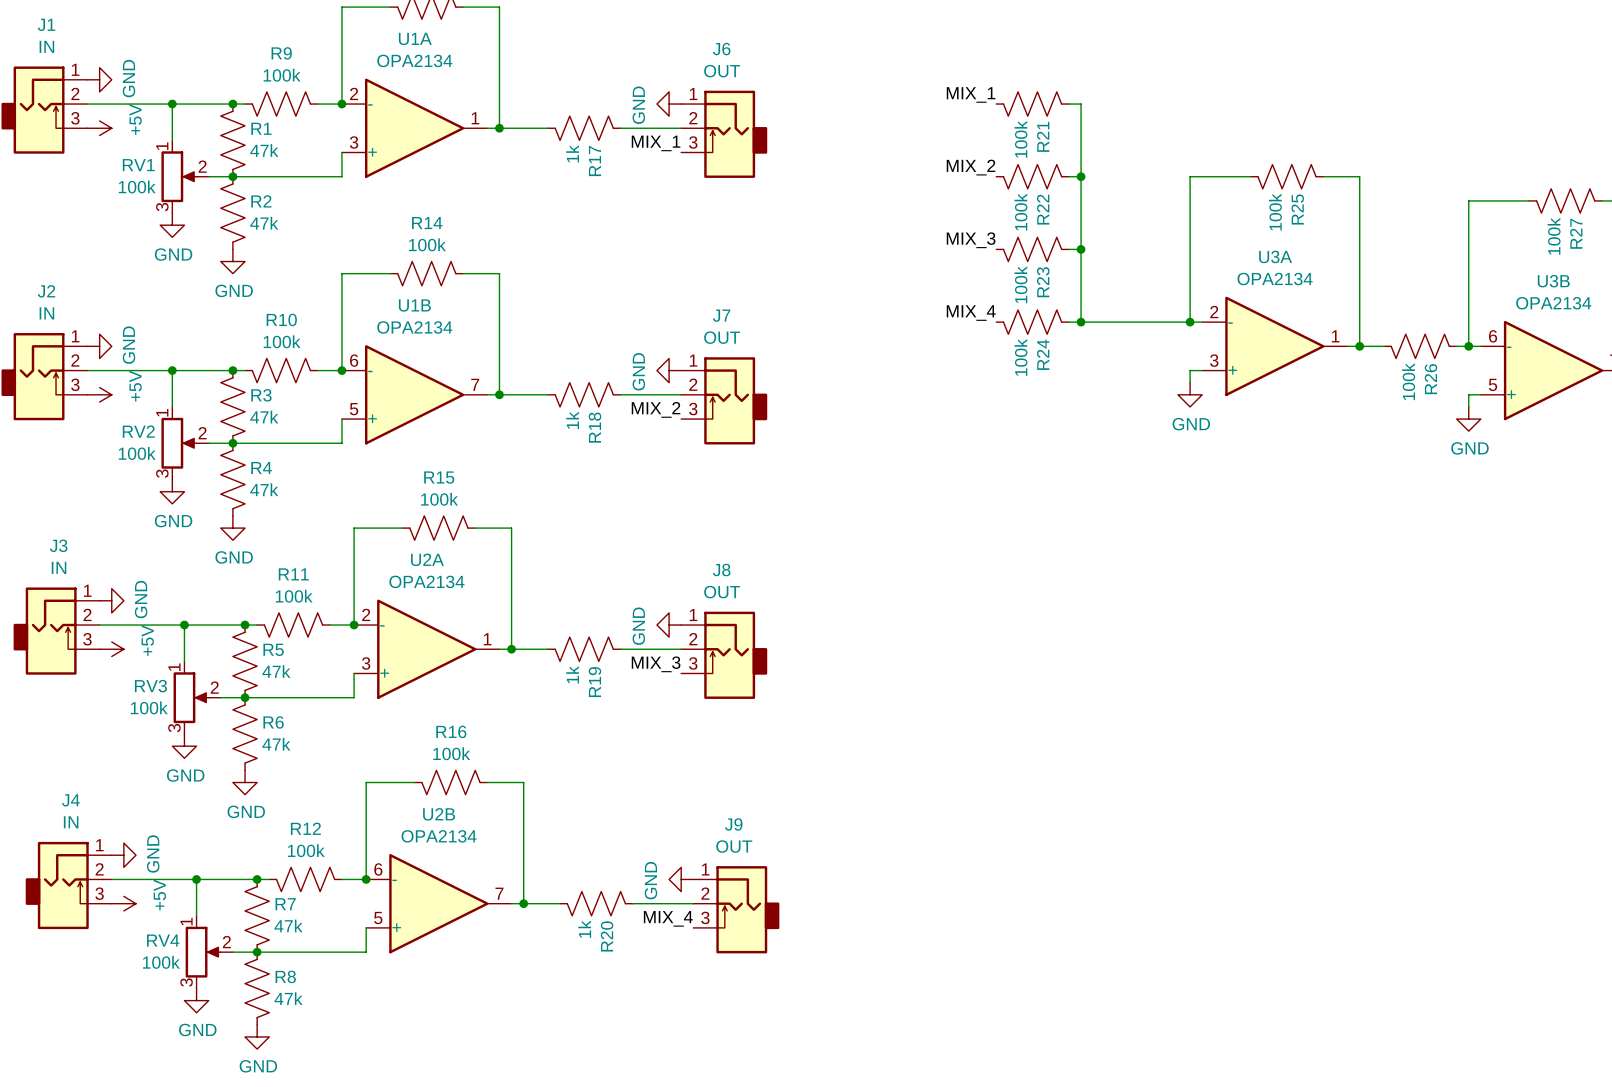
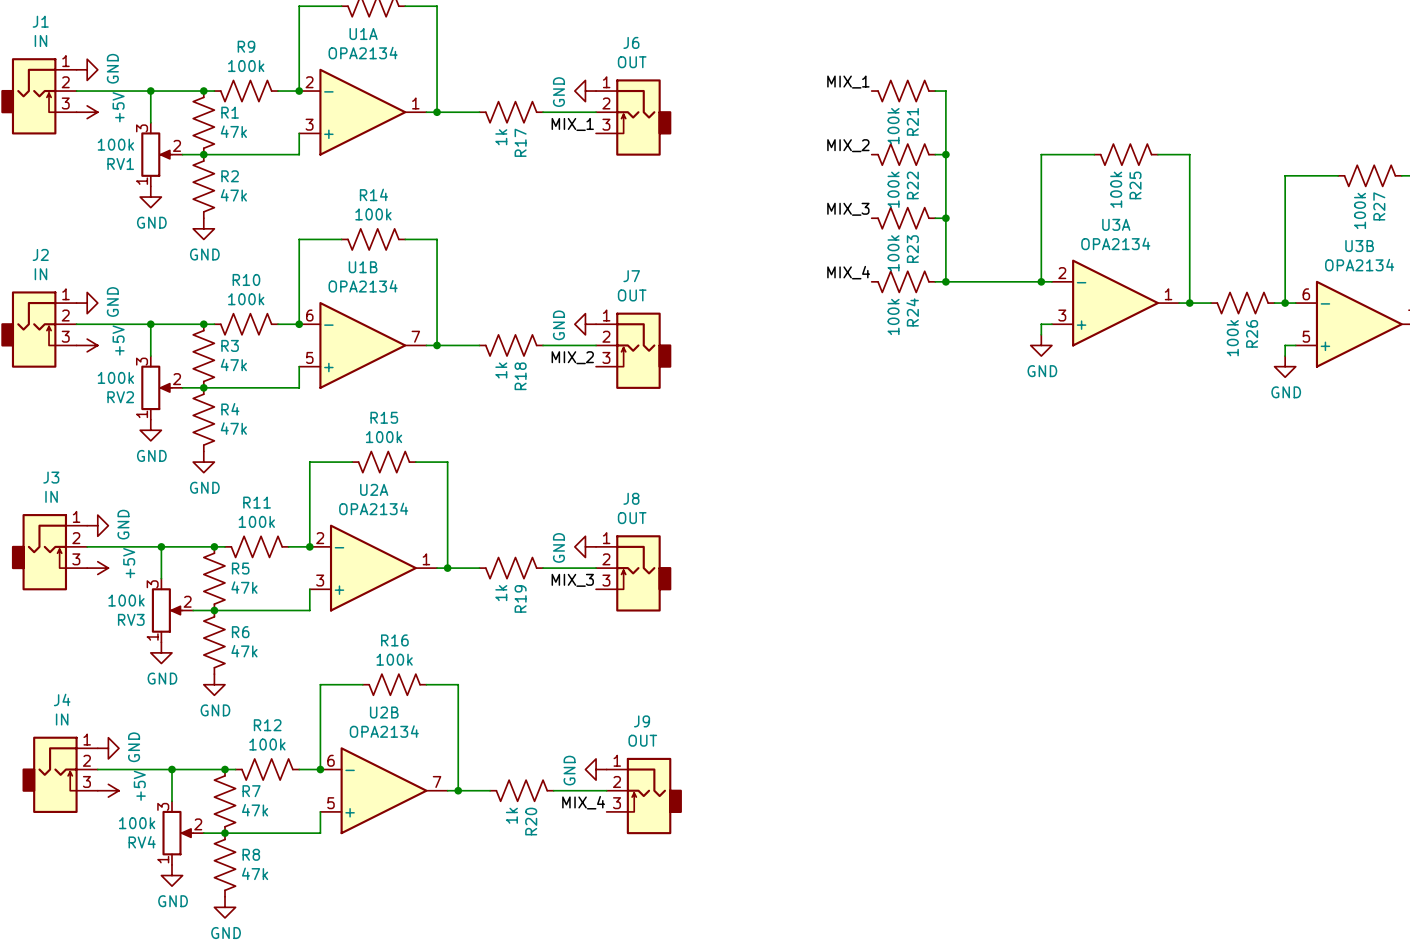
RV1 flip: as is (178, 176) -> up-down (156, 154)
RV2 flip: as is (178, 443) -> up-down (156, 387)
RV3 flip: as is (191, 697) -> up-down (167, 610)
RV4 flip: as is (203, 952) -> up-down (177, 833)

